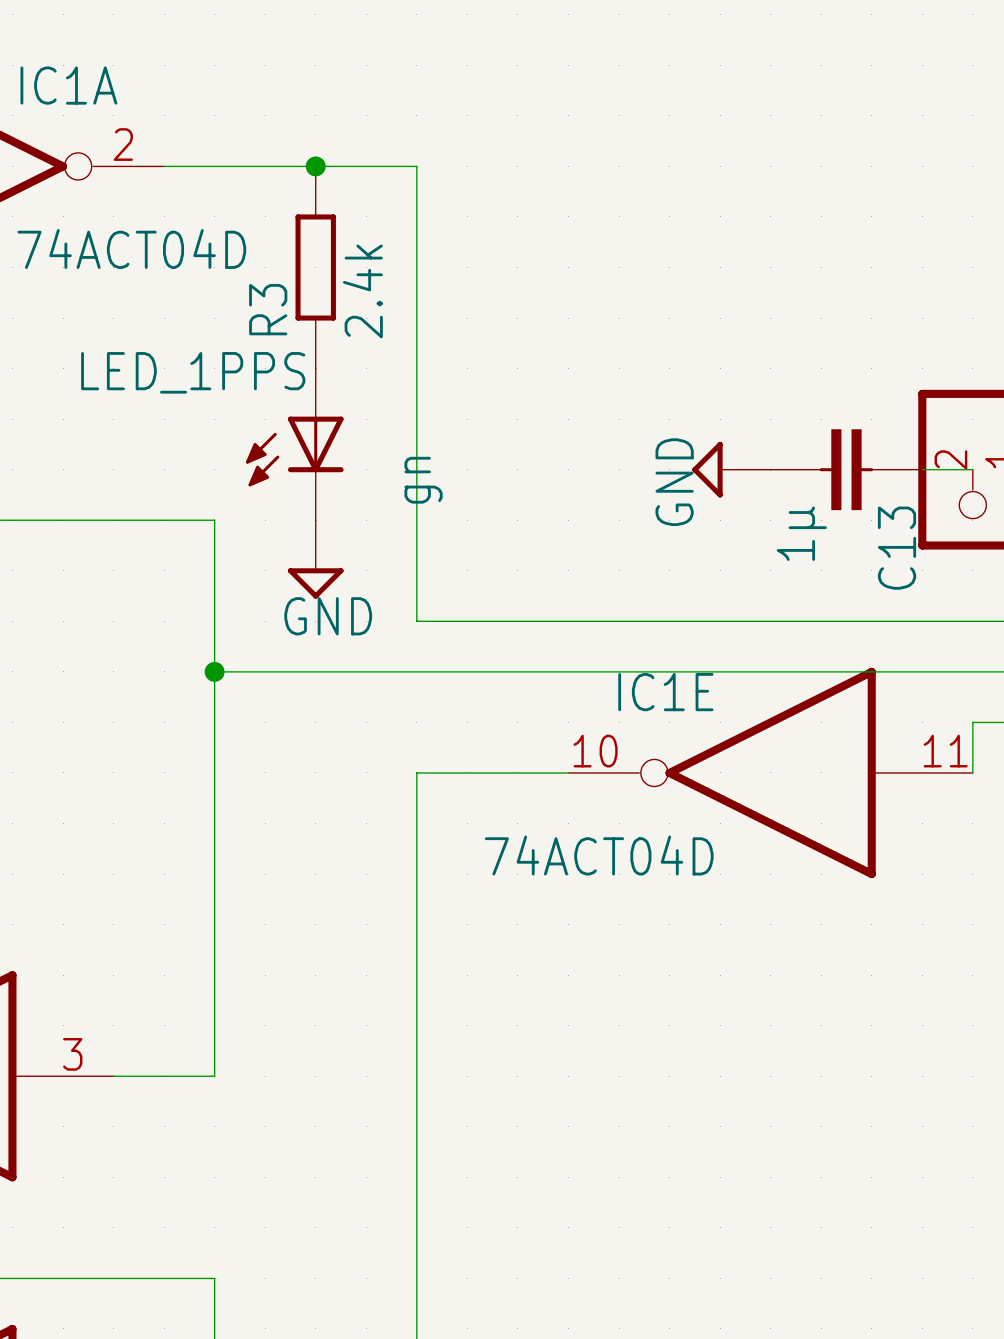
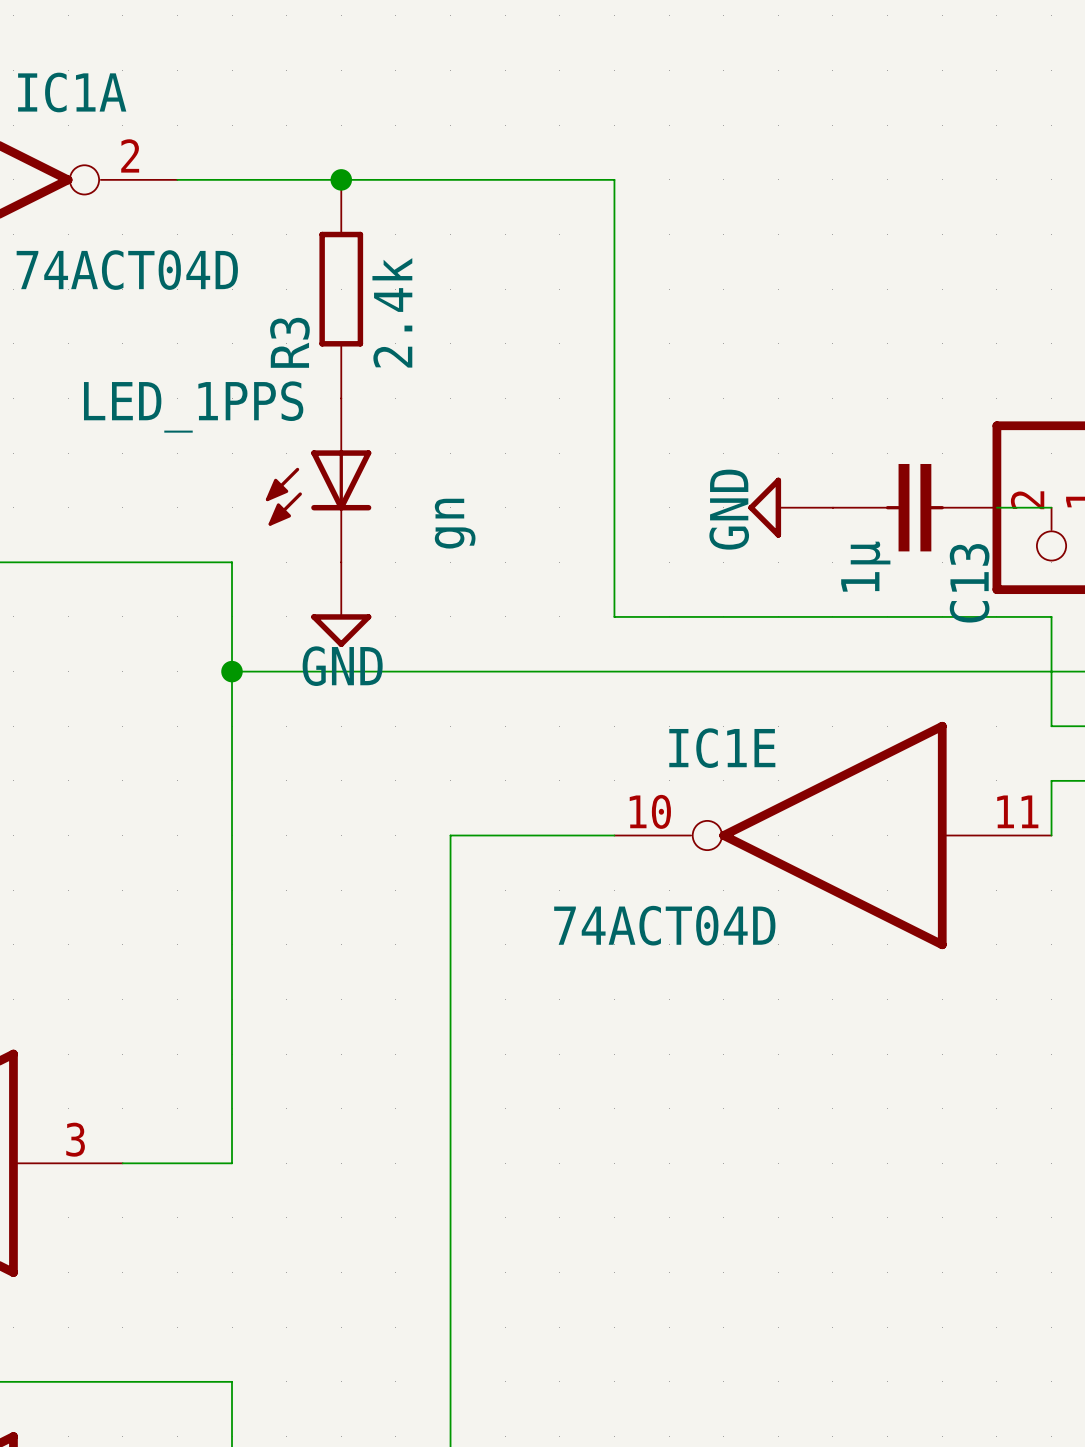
wire: (416, 166) (416, 621) -> (232, 671) (450, 671)
wire: (214, 671) (972, 671) -> (450, 179) (614, 179) (614, 616) (1051, 616) (1051, 726)
junction position: (214, 671) -> (232, 671)

